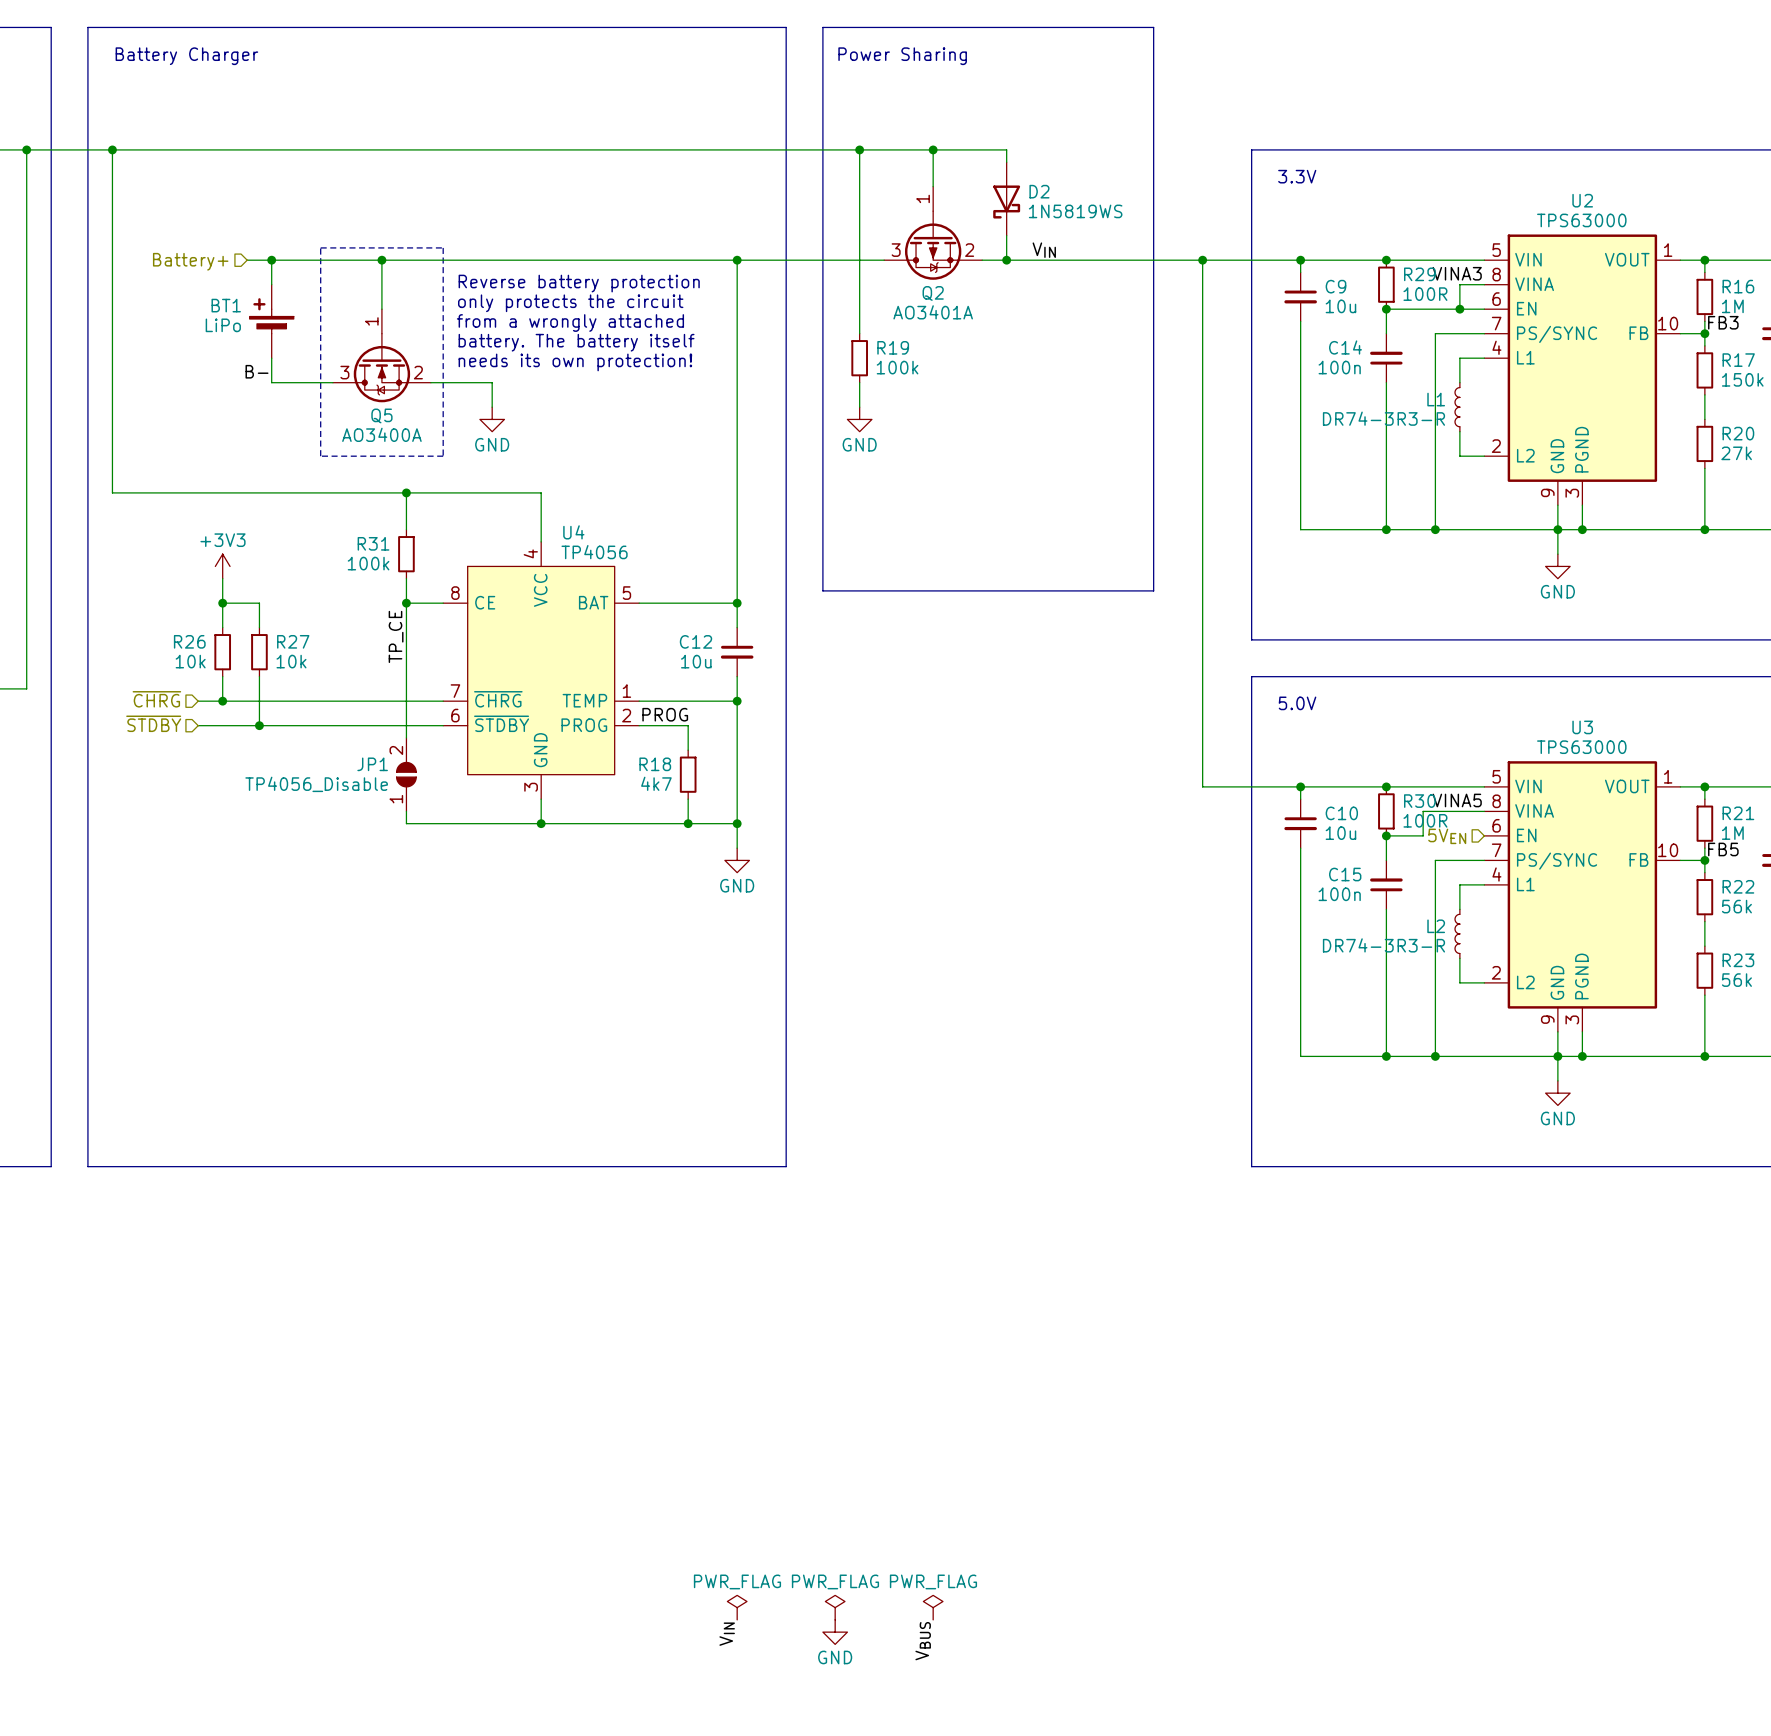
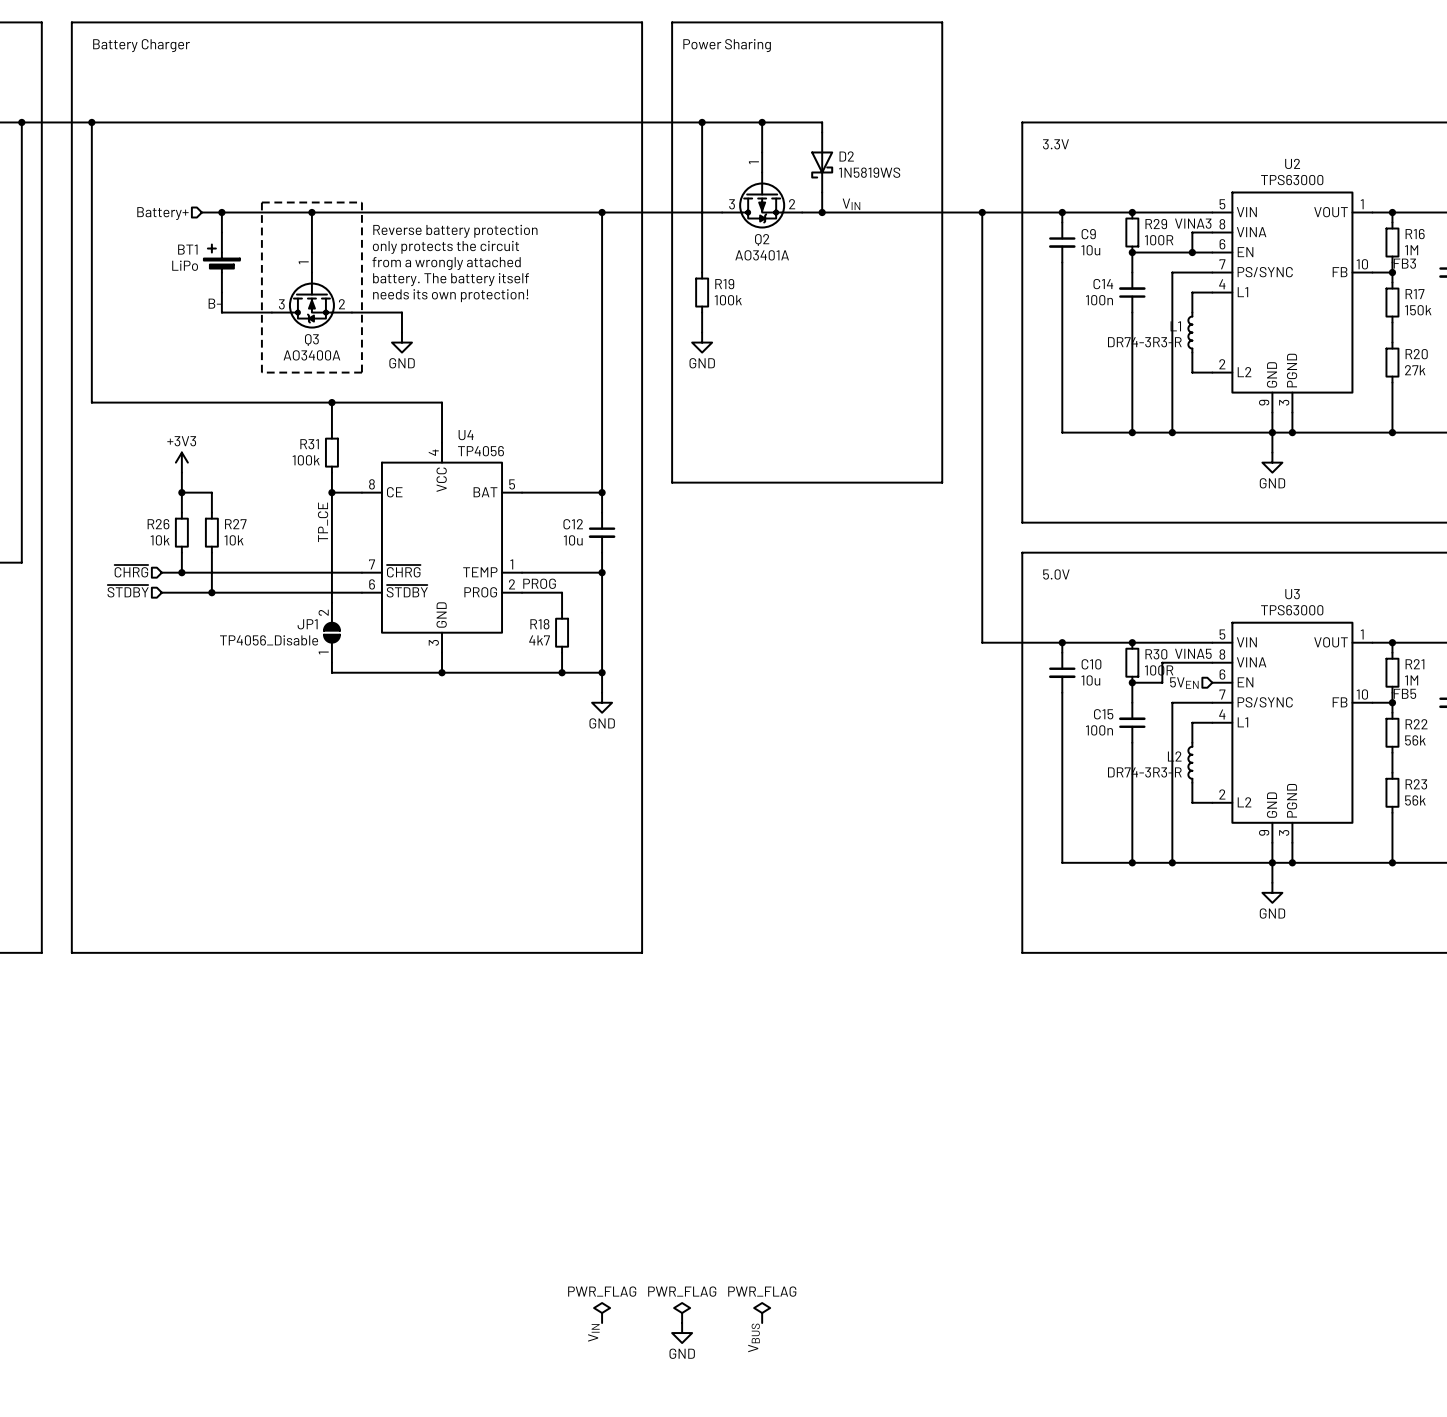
Q5 name: Q5 (381, 415) -> Q3 (311, 340)

